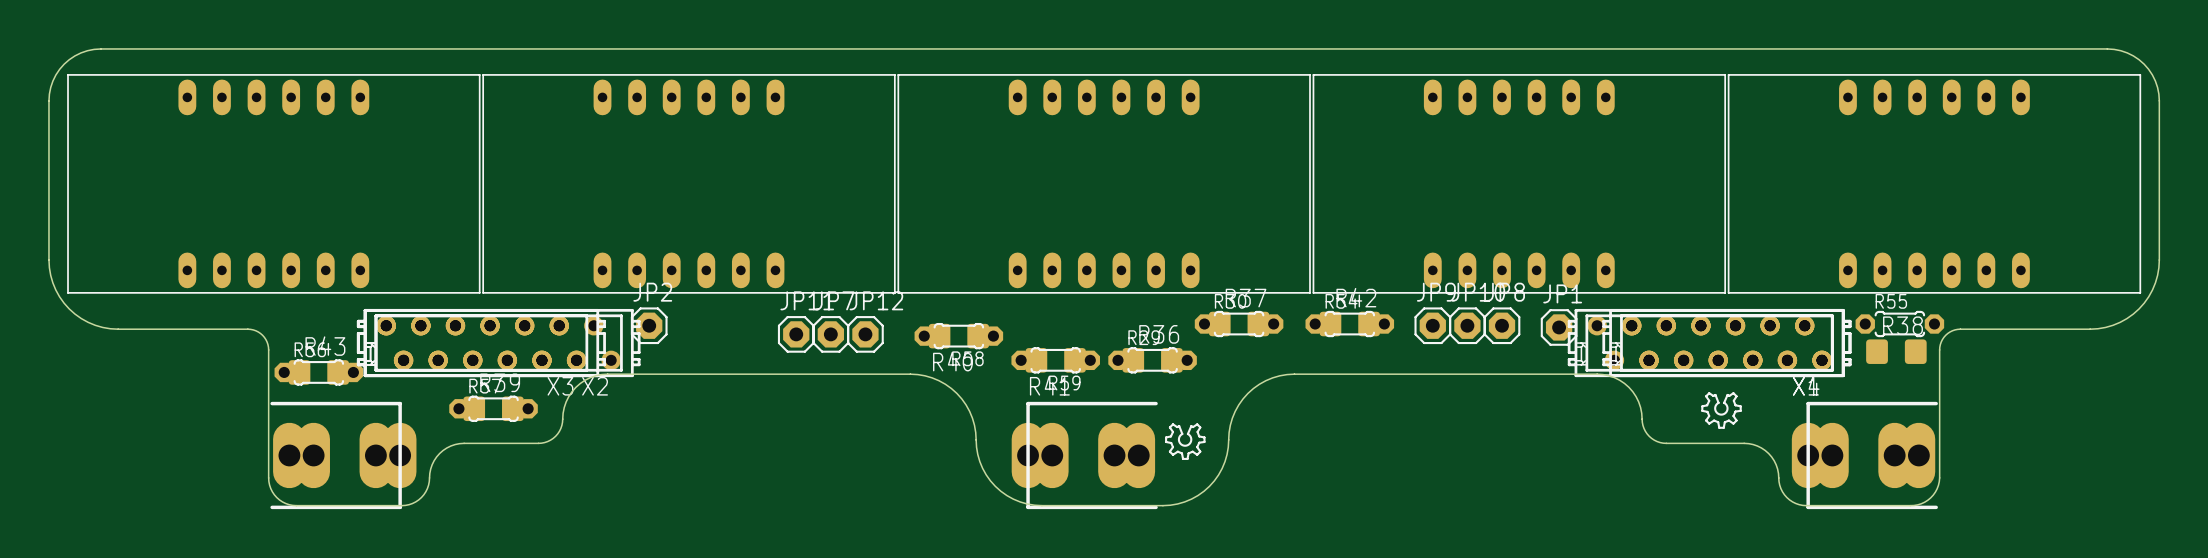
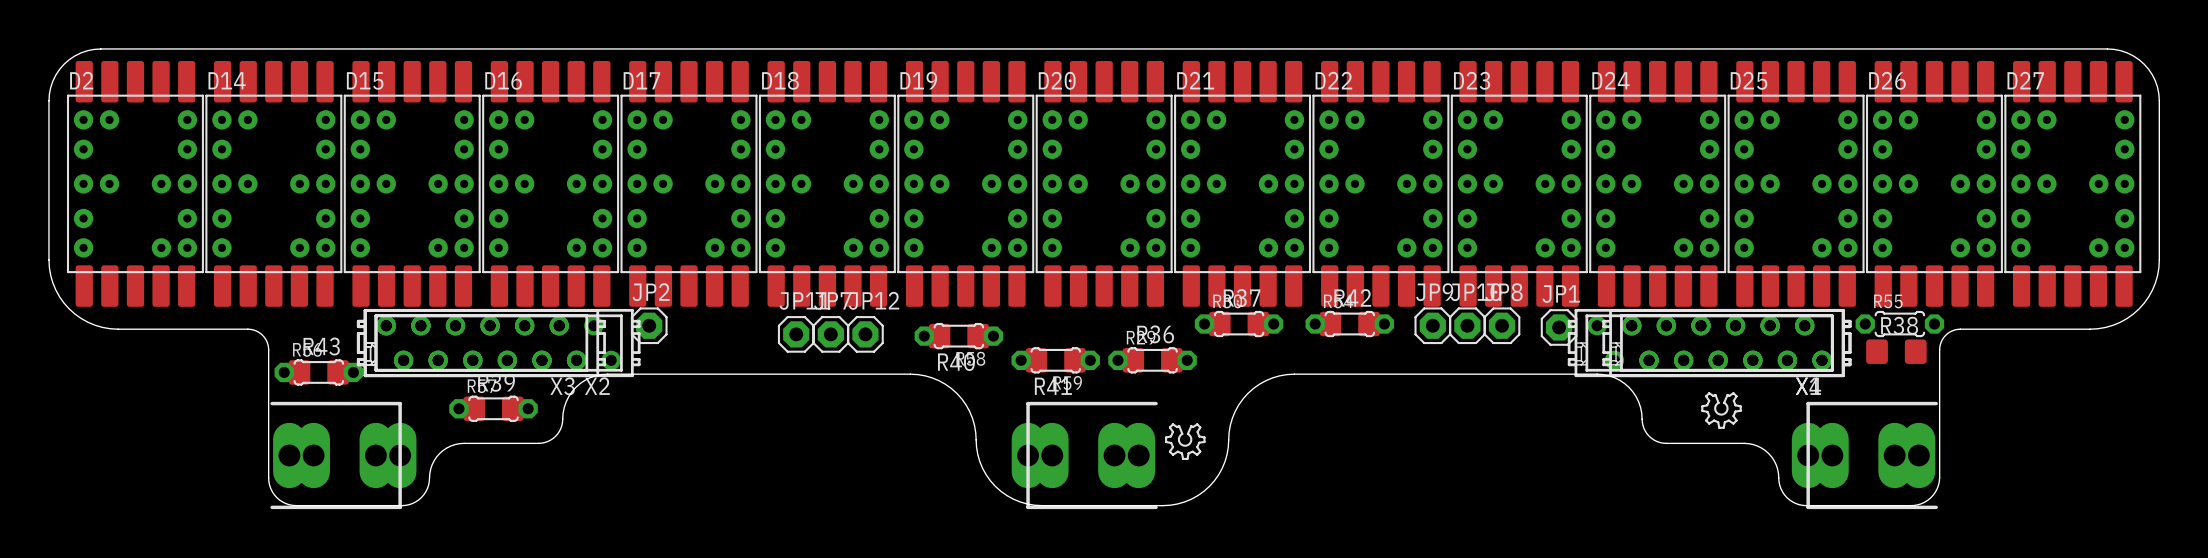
D2: none -> (135, 183)
part: (273, 183) -> none
D14: none -> (273, 183)
D15: none -> (412, 183)
D16: none -> (550, 183)
part: (689, 183) -> none
D17: none -> (689, 183)
D18: none -> (827, 183)
D19: none -> (965, 183)
part: (1104, 183) -> none
D20: none -> (1104, 183)
D21: none -> (1242, 183)
D22: none -> (1380, 183)
part: (1519, 183) -> none
D23: none -> (1519, 183)
D24: none -> (1657, 183)
D25: none -> (1796, 183)
part: (1934, 183) -> none
D26: none -> (1934, 183)
D27: none -> (2072, 183)

